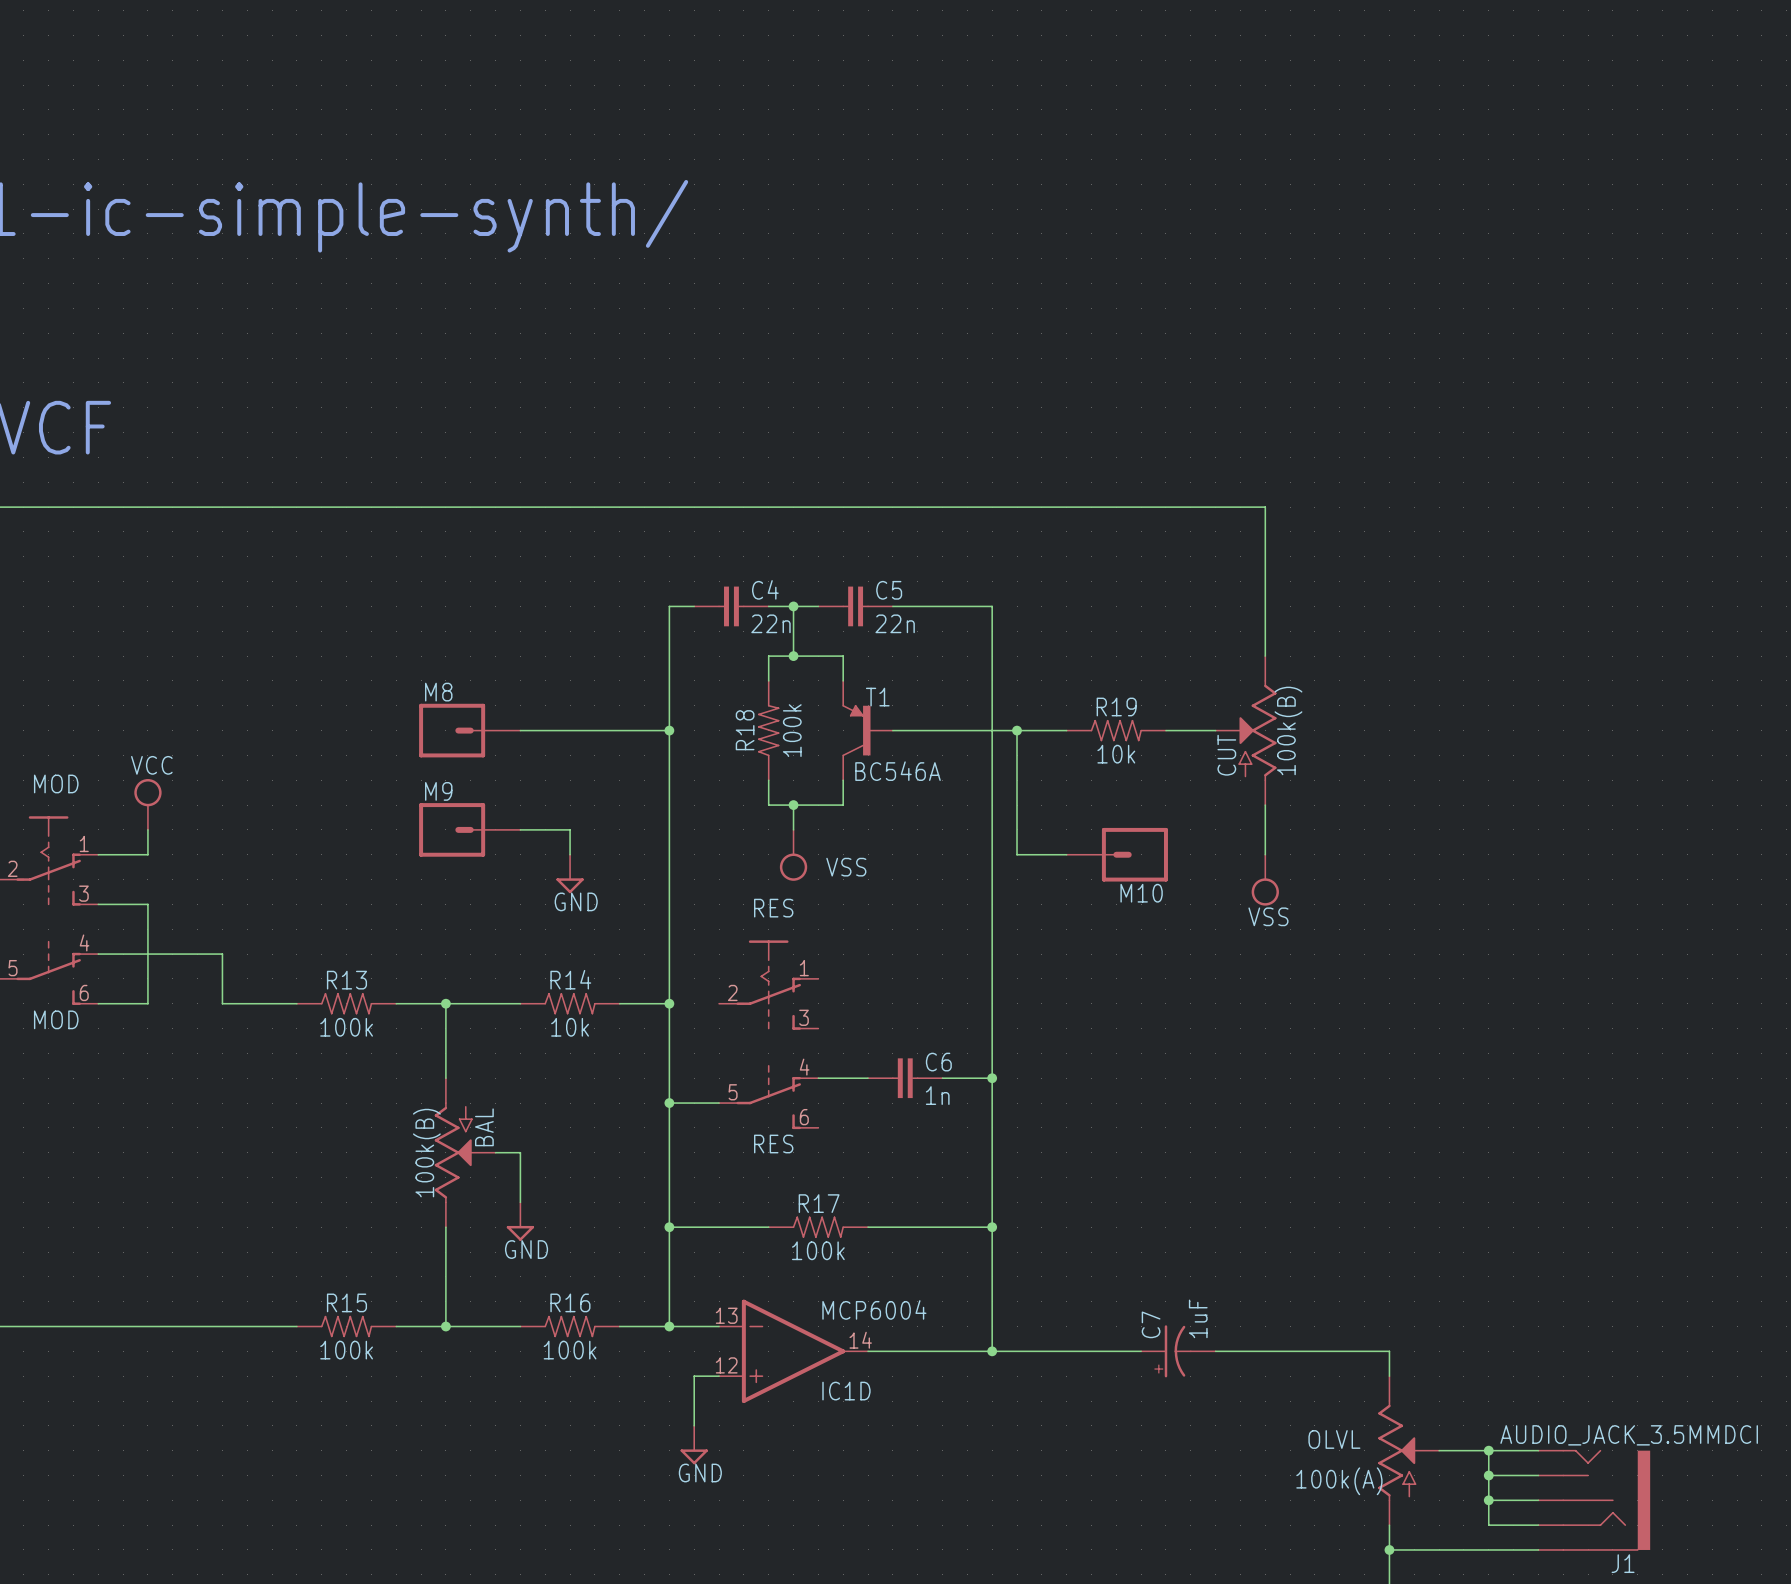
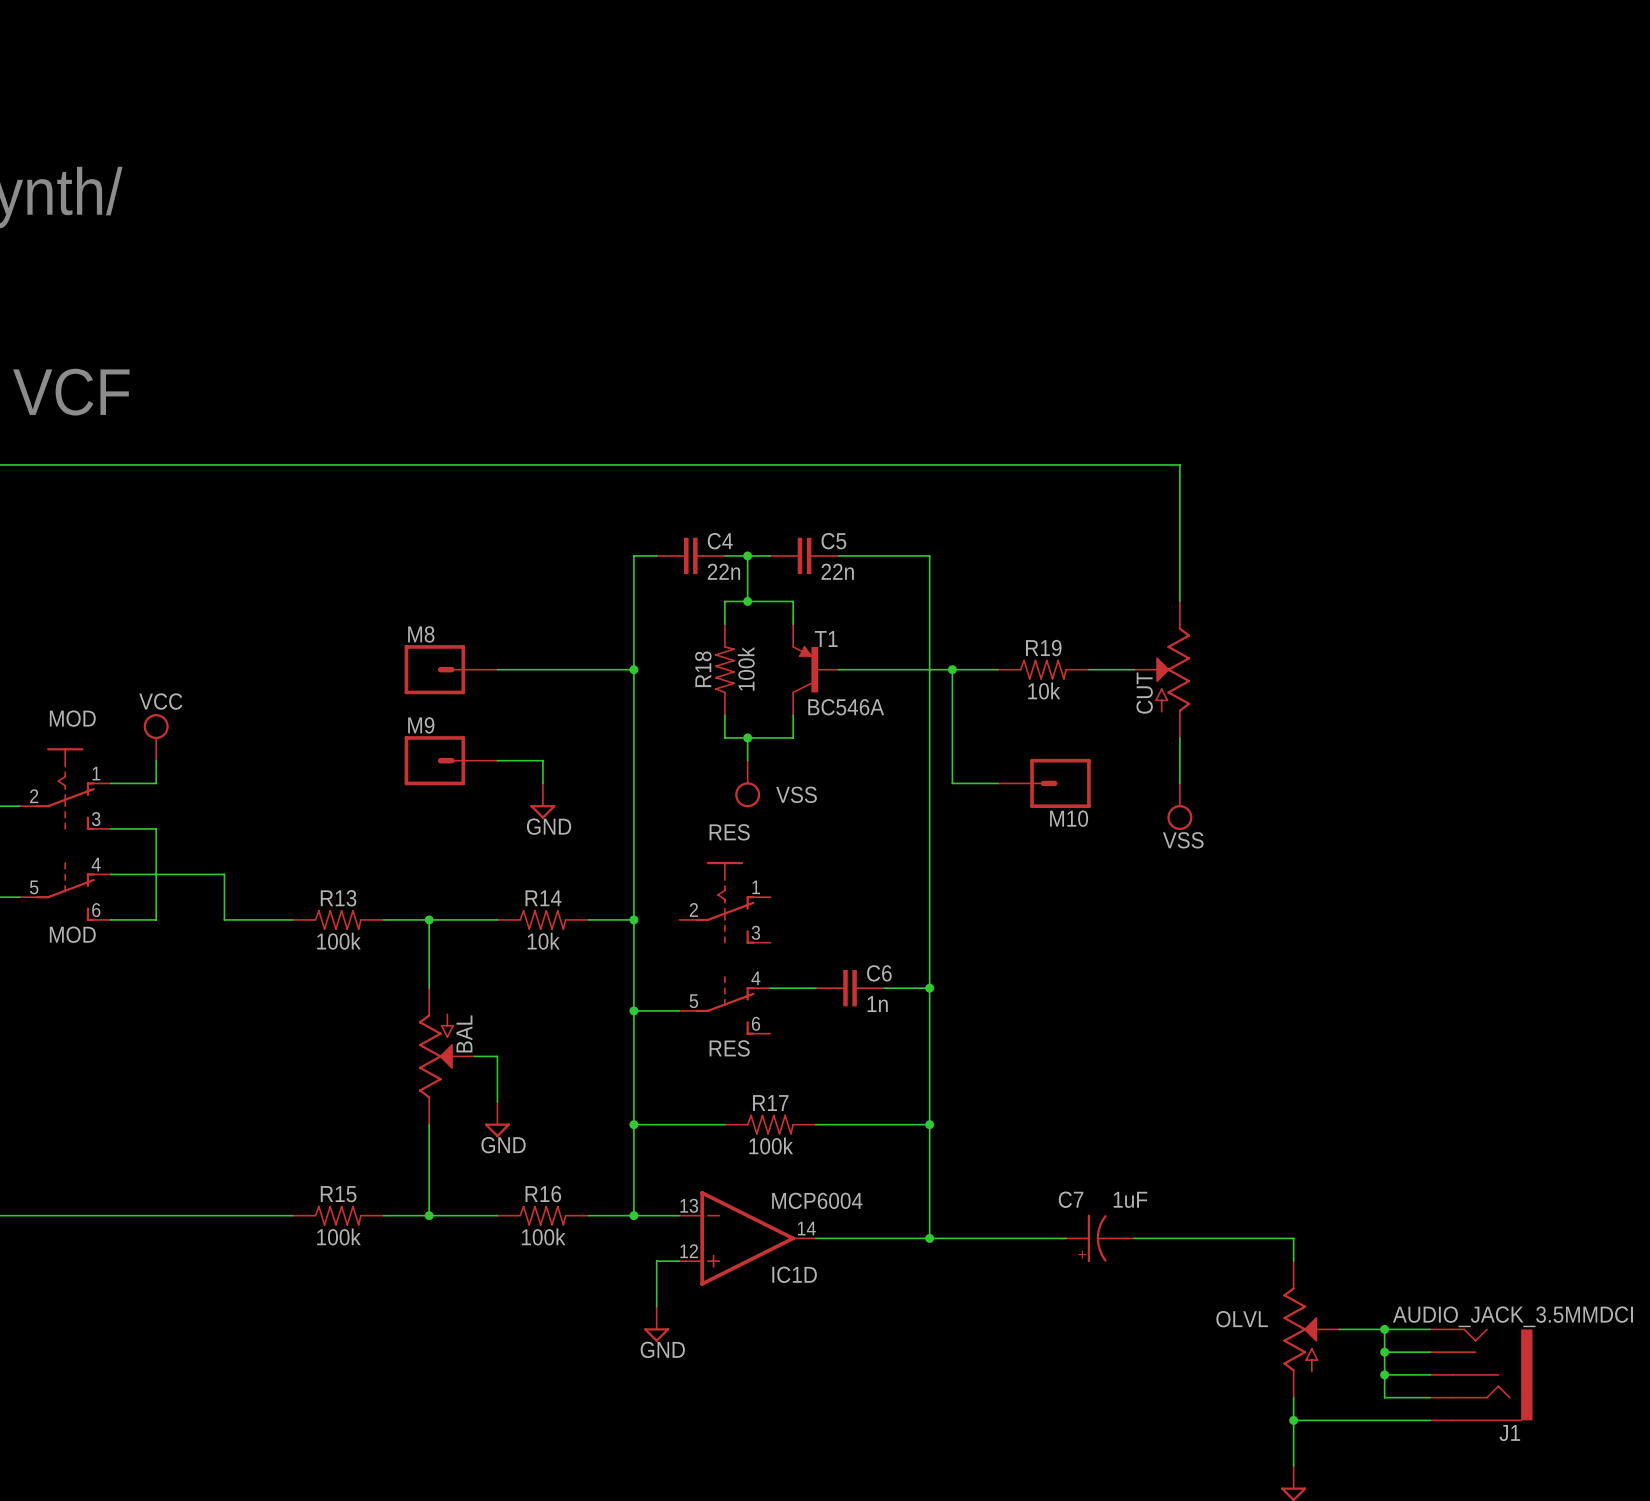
CUT value: 100k(B) (1288, 730) -> none
BAL value: 100k(B) (426, 1153) -> none
C7 value rotation: 0° (1198, 1318) -> 90° clockwise (1130, 1199)
C7 name rotation: 0° (1151, 1324) -> 90° clockwise (1071, 1199)
OLVL value: 100k(A) (1339, 1481) -> none

